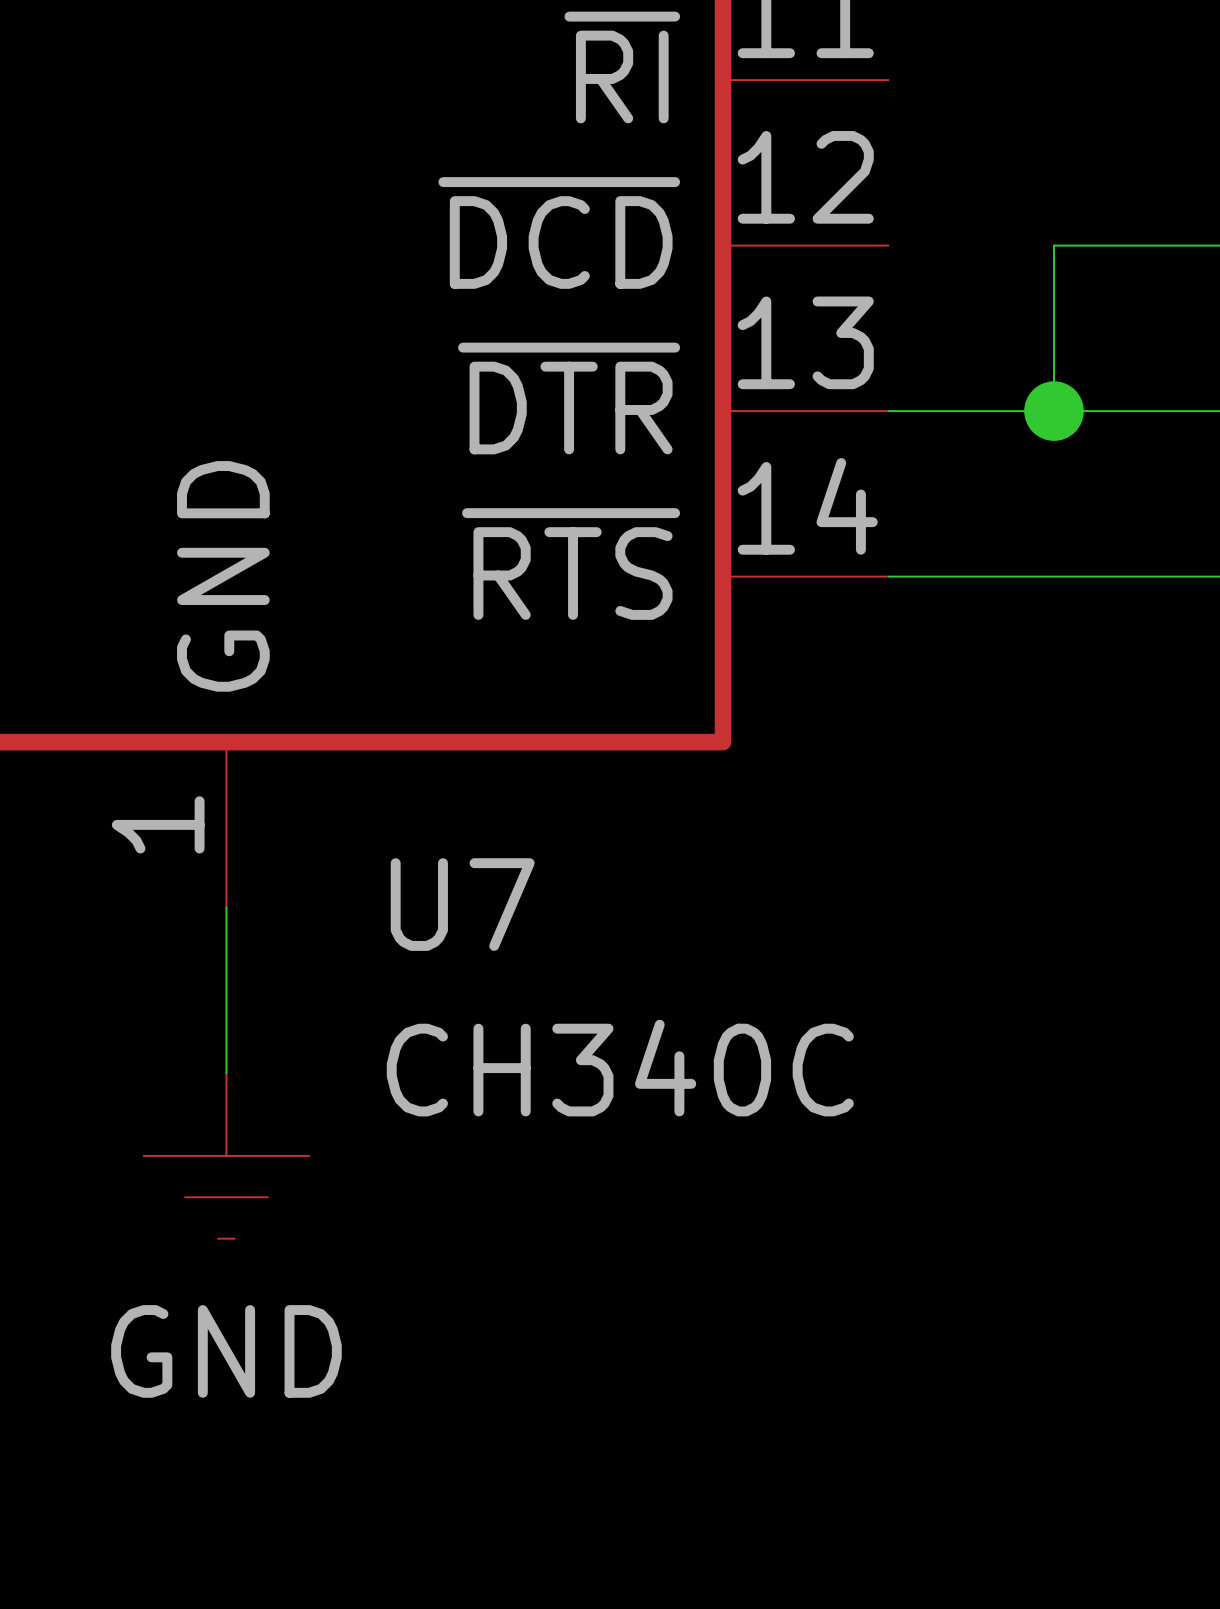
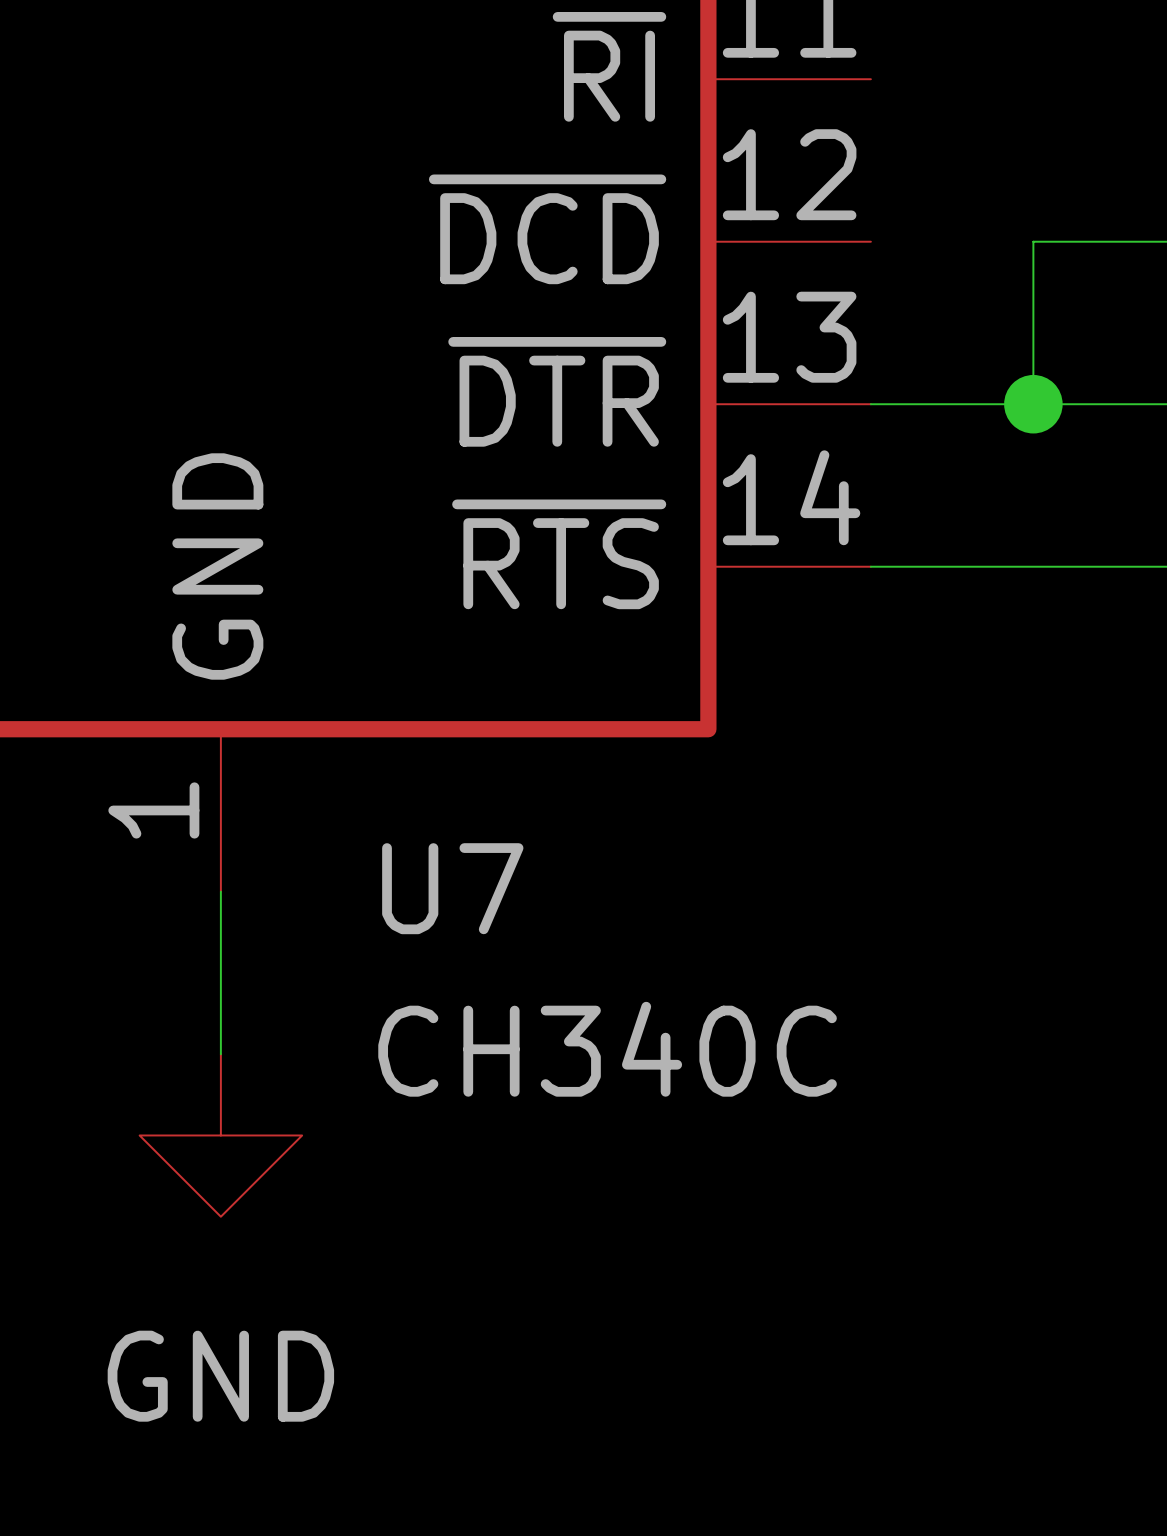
power symbol shape: [143, 1073, 310, 1239] -> [139, 1054, 303, 1217]
power symbol text position: GND (226, 1351) -> GND (220, 1376)

